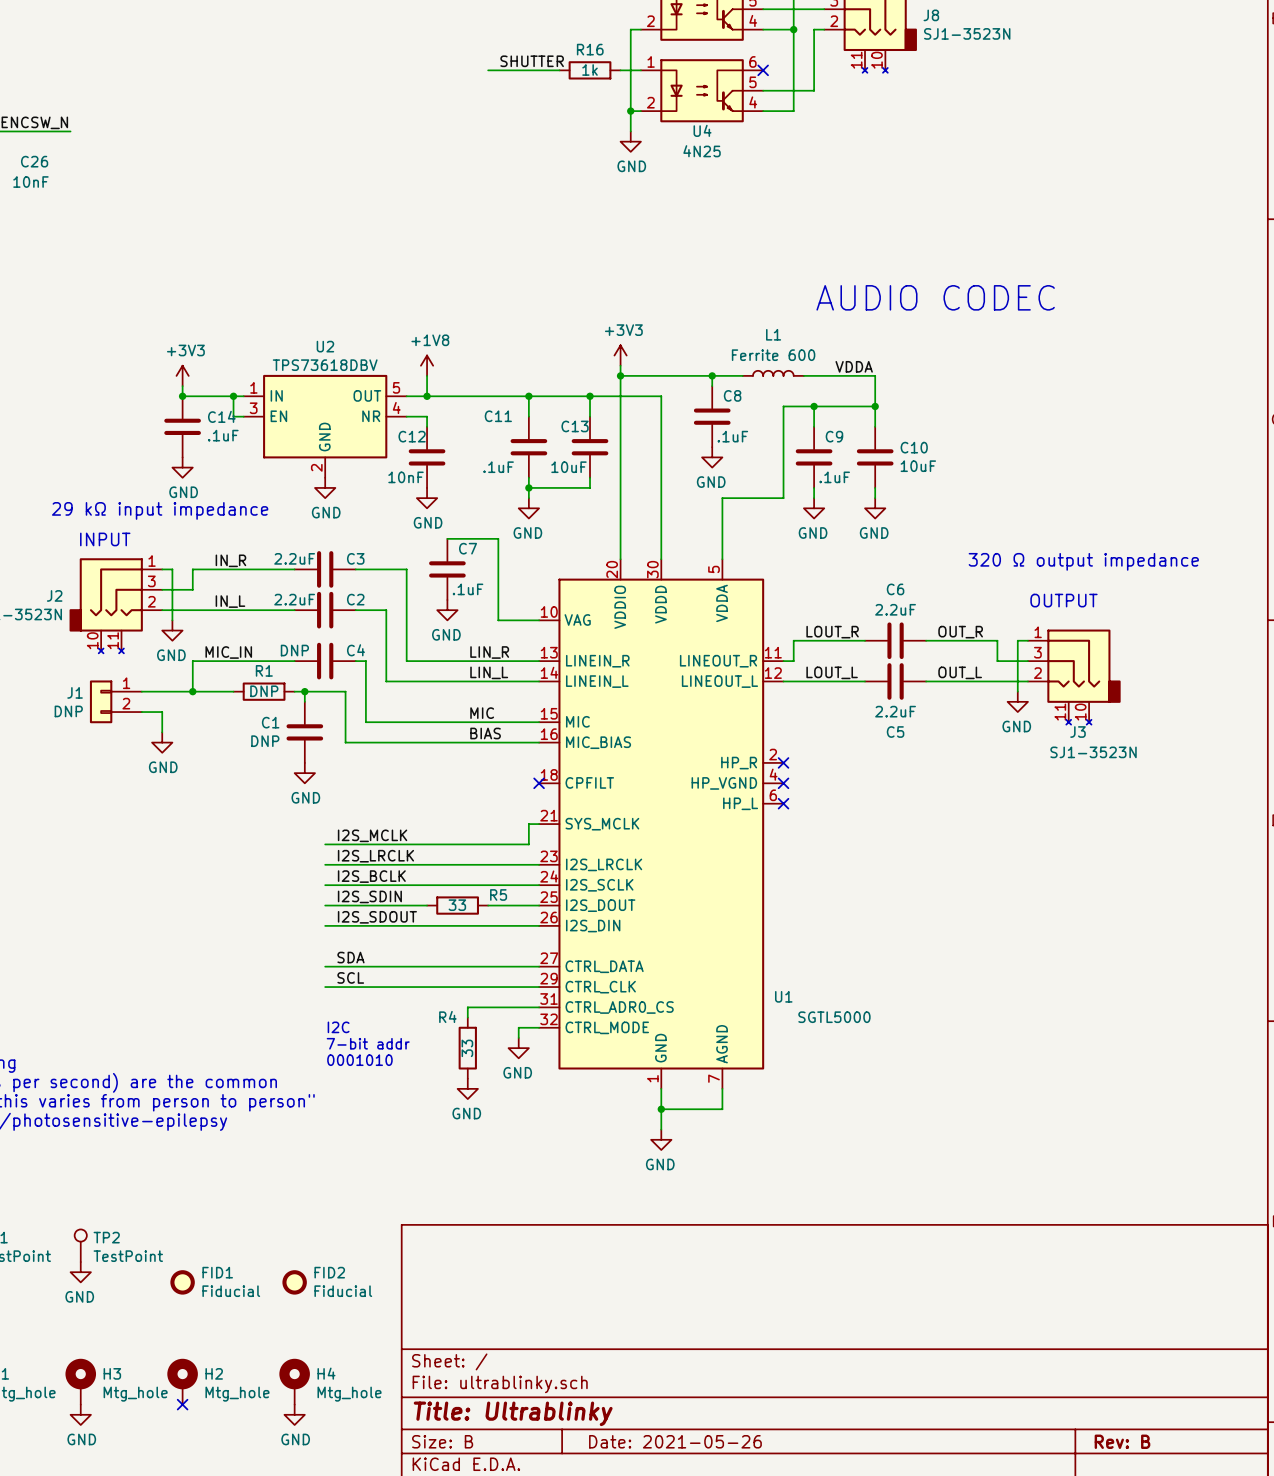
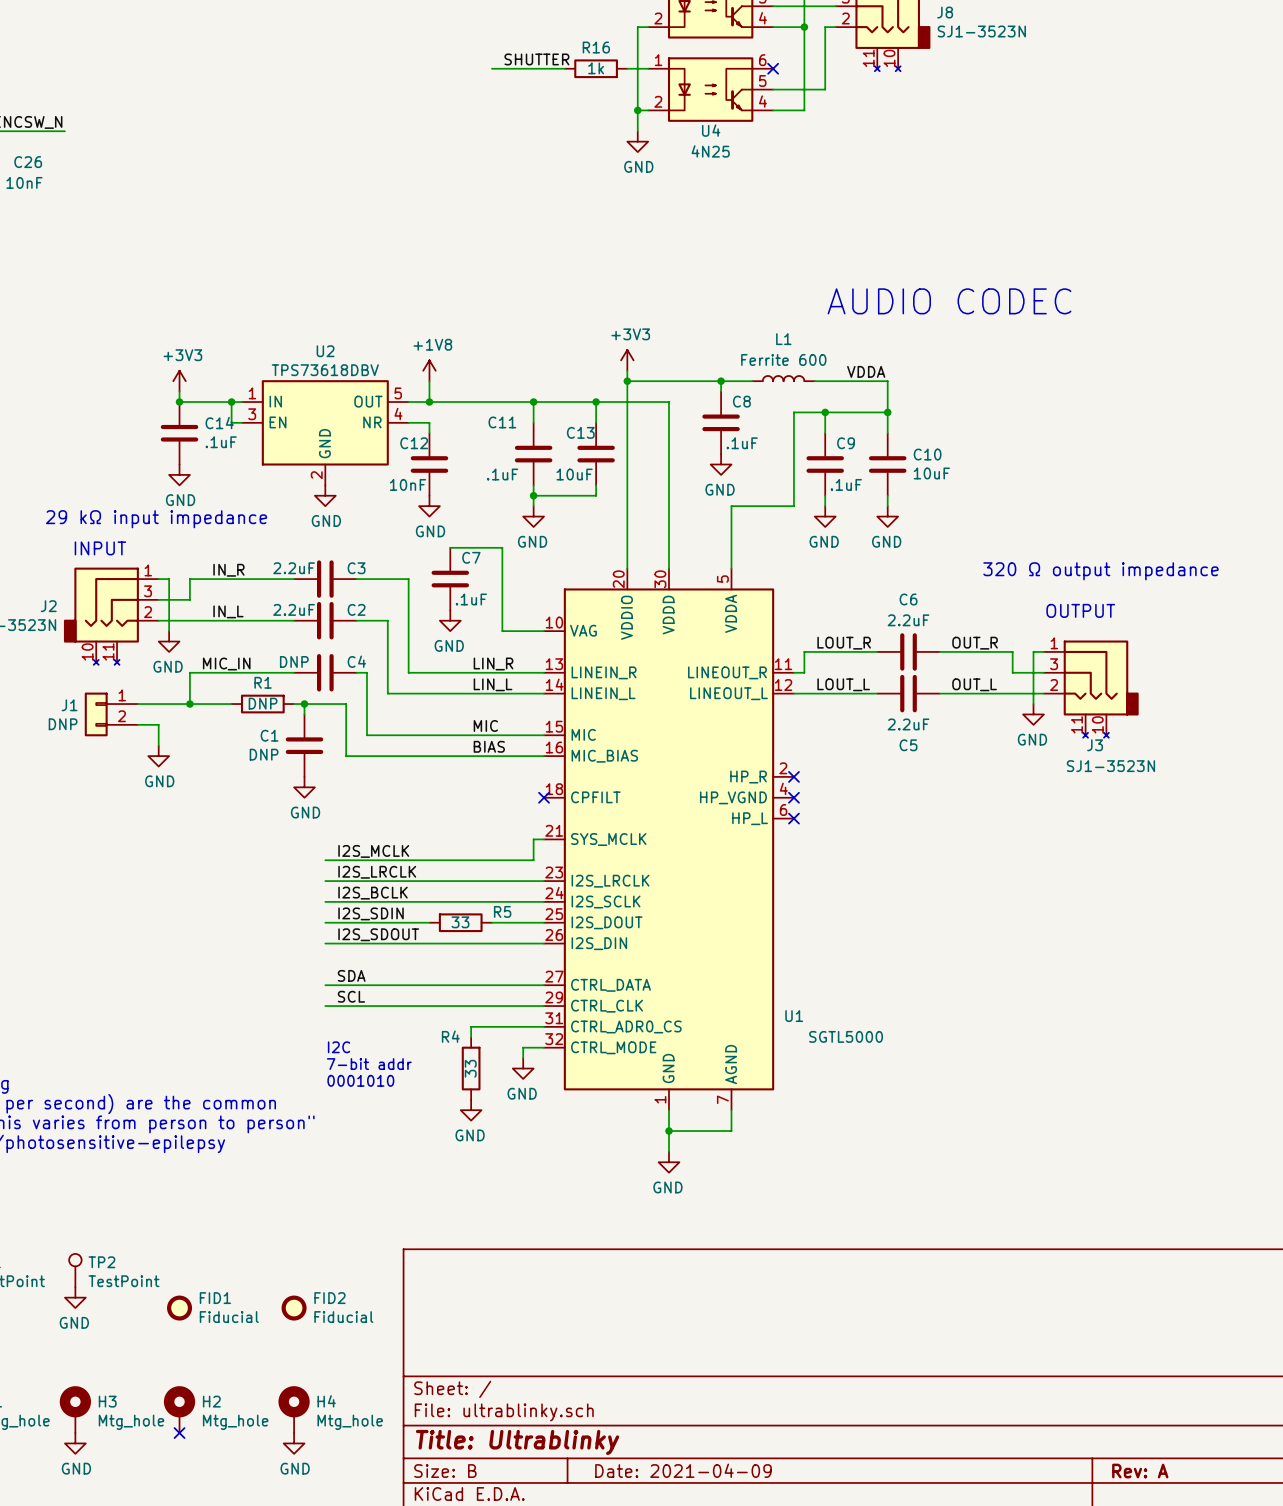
title block: Date: 2021-05-26 (675, 1441) -> Date: 2021-04-09 (683, 1470)
title block: Rev: B (1122, 1441) -> Rev: A (1140, 1471)

